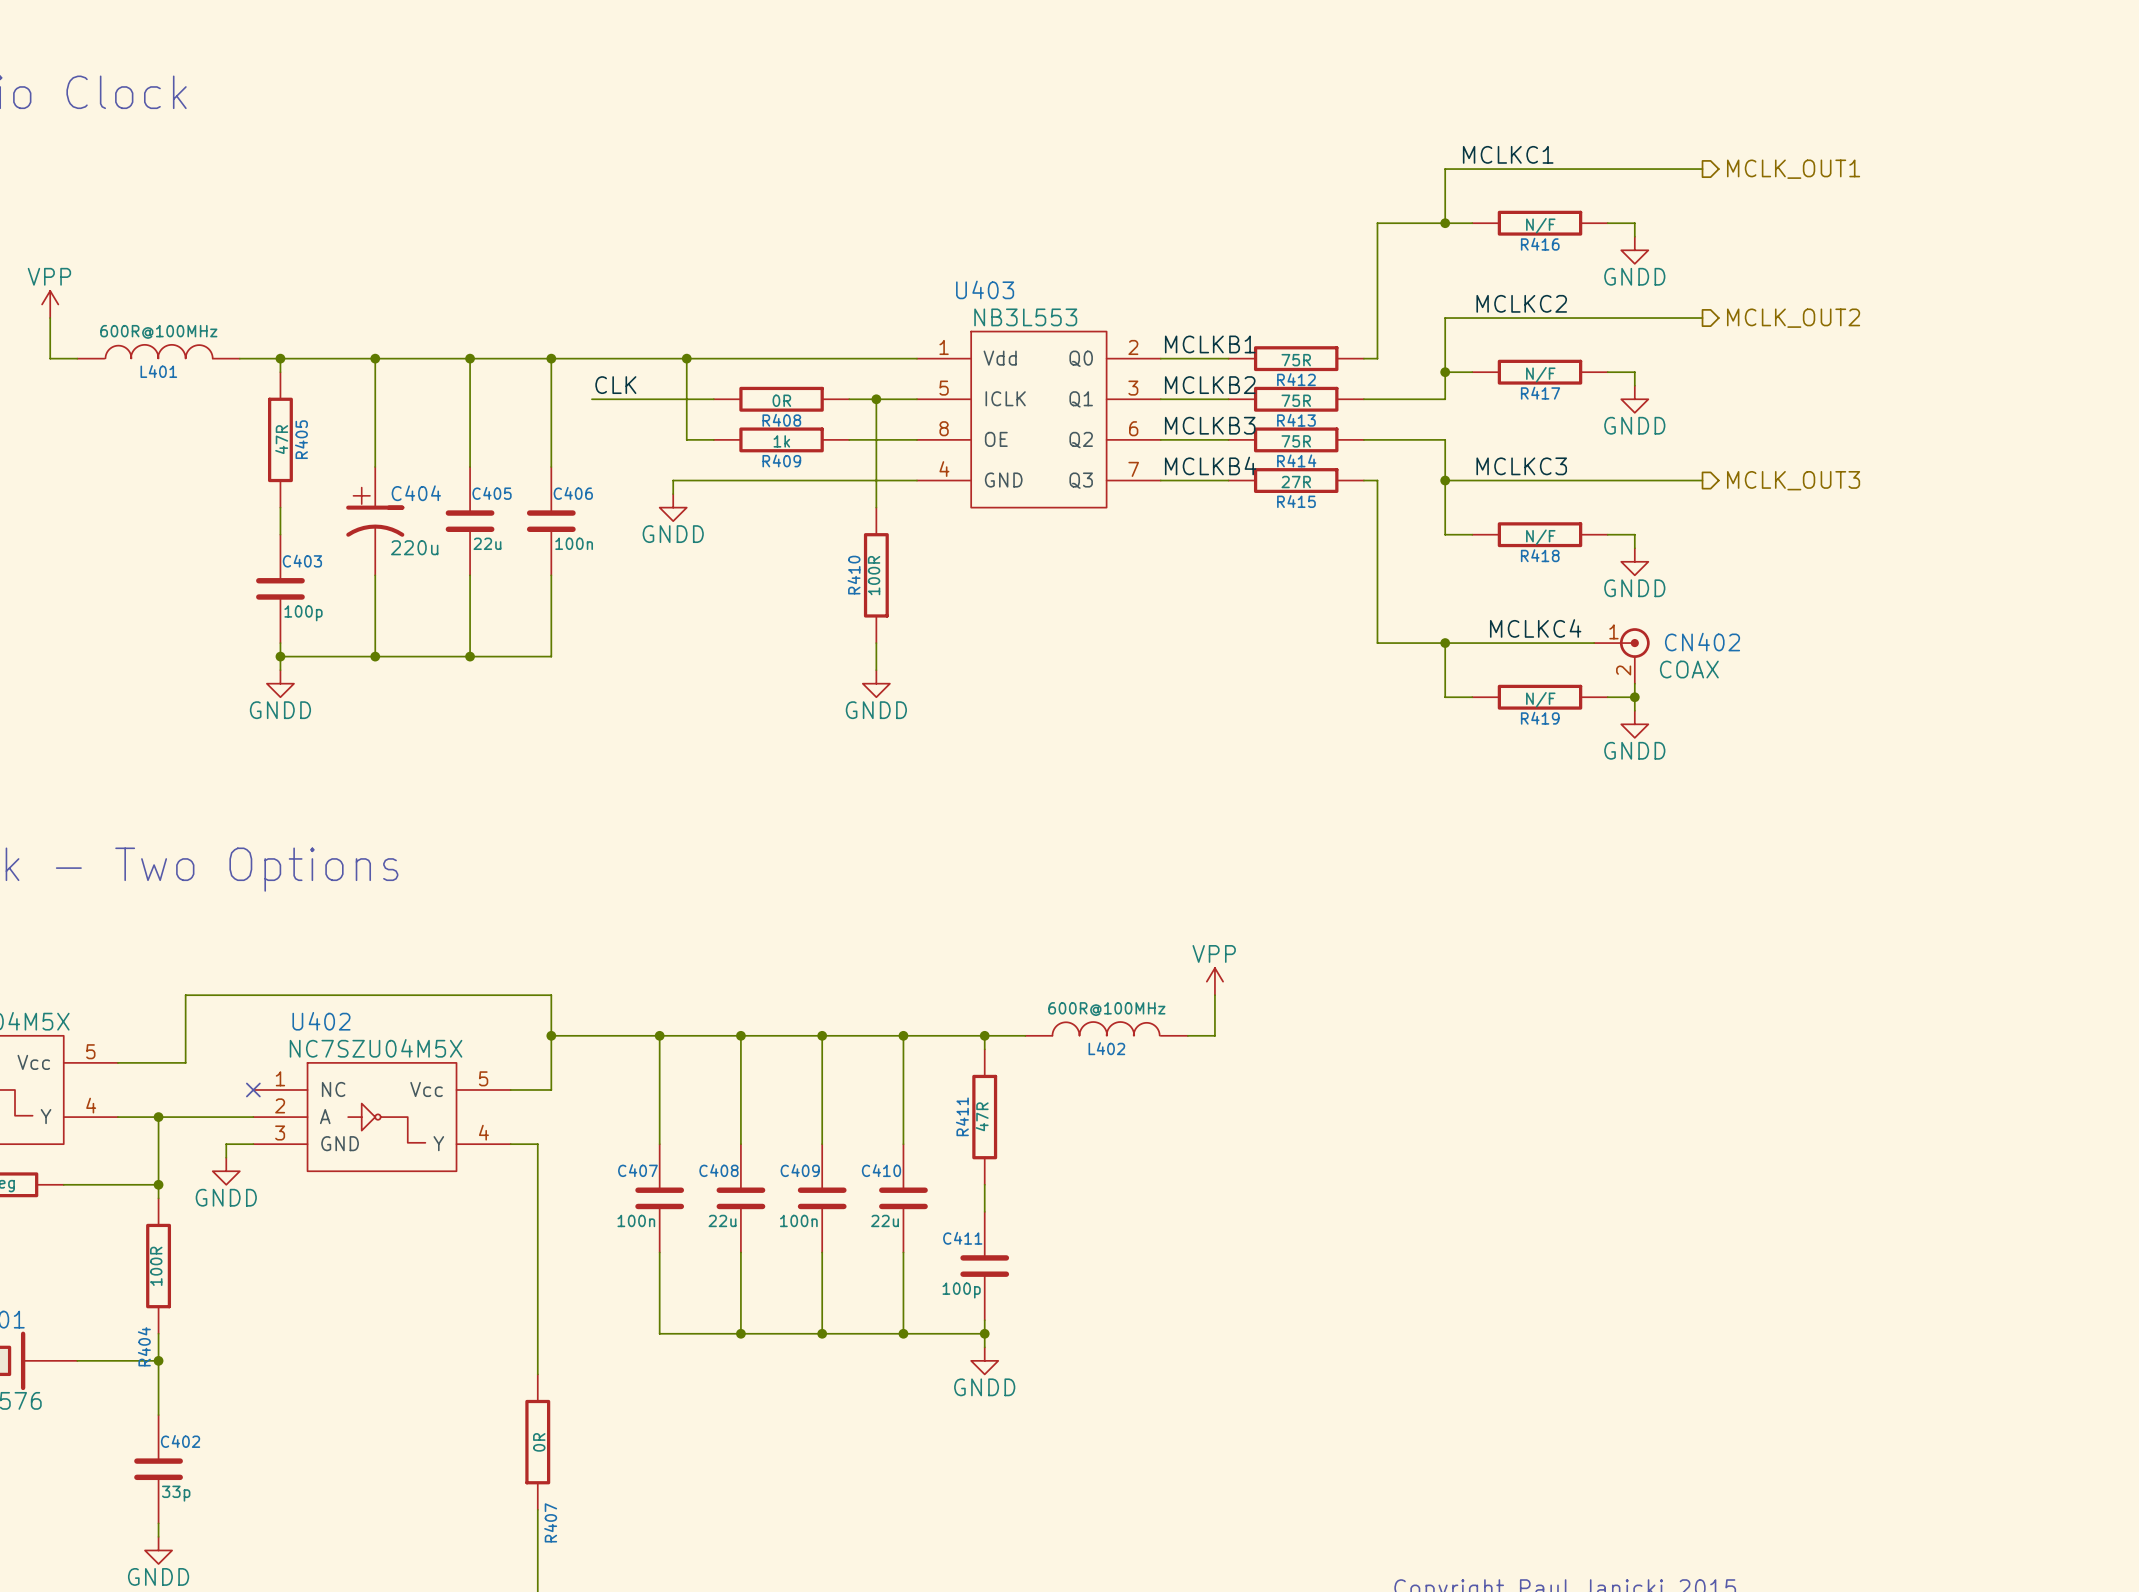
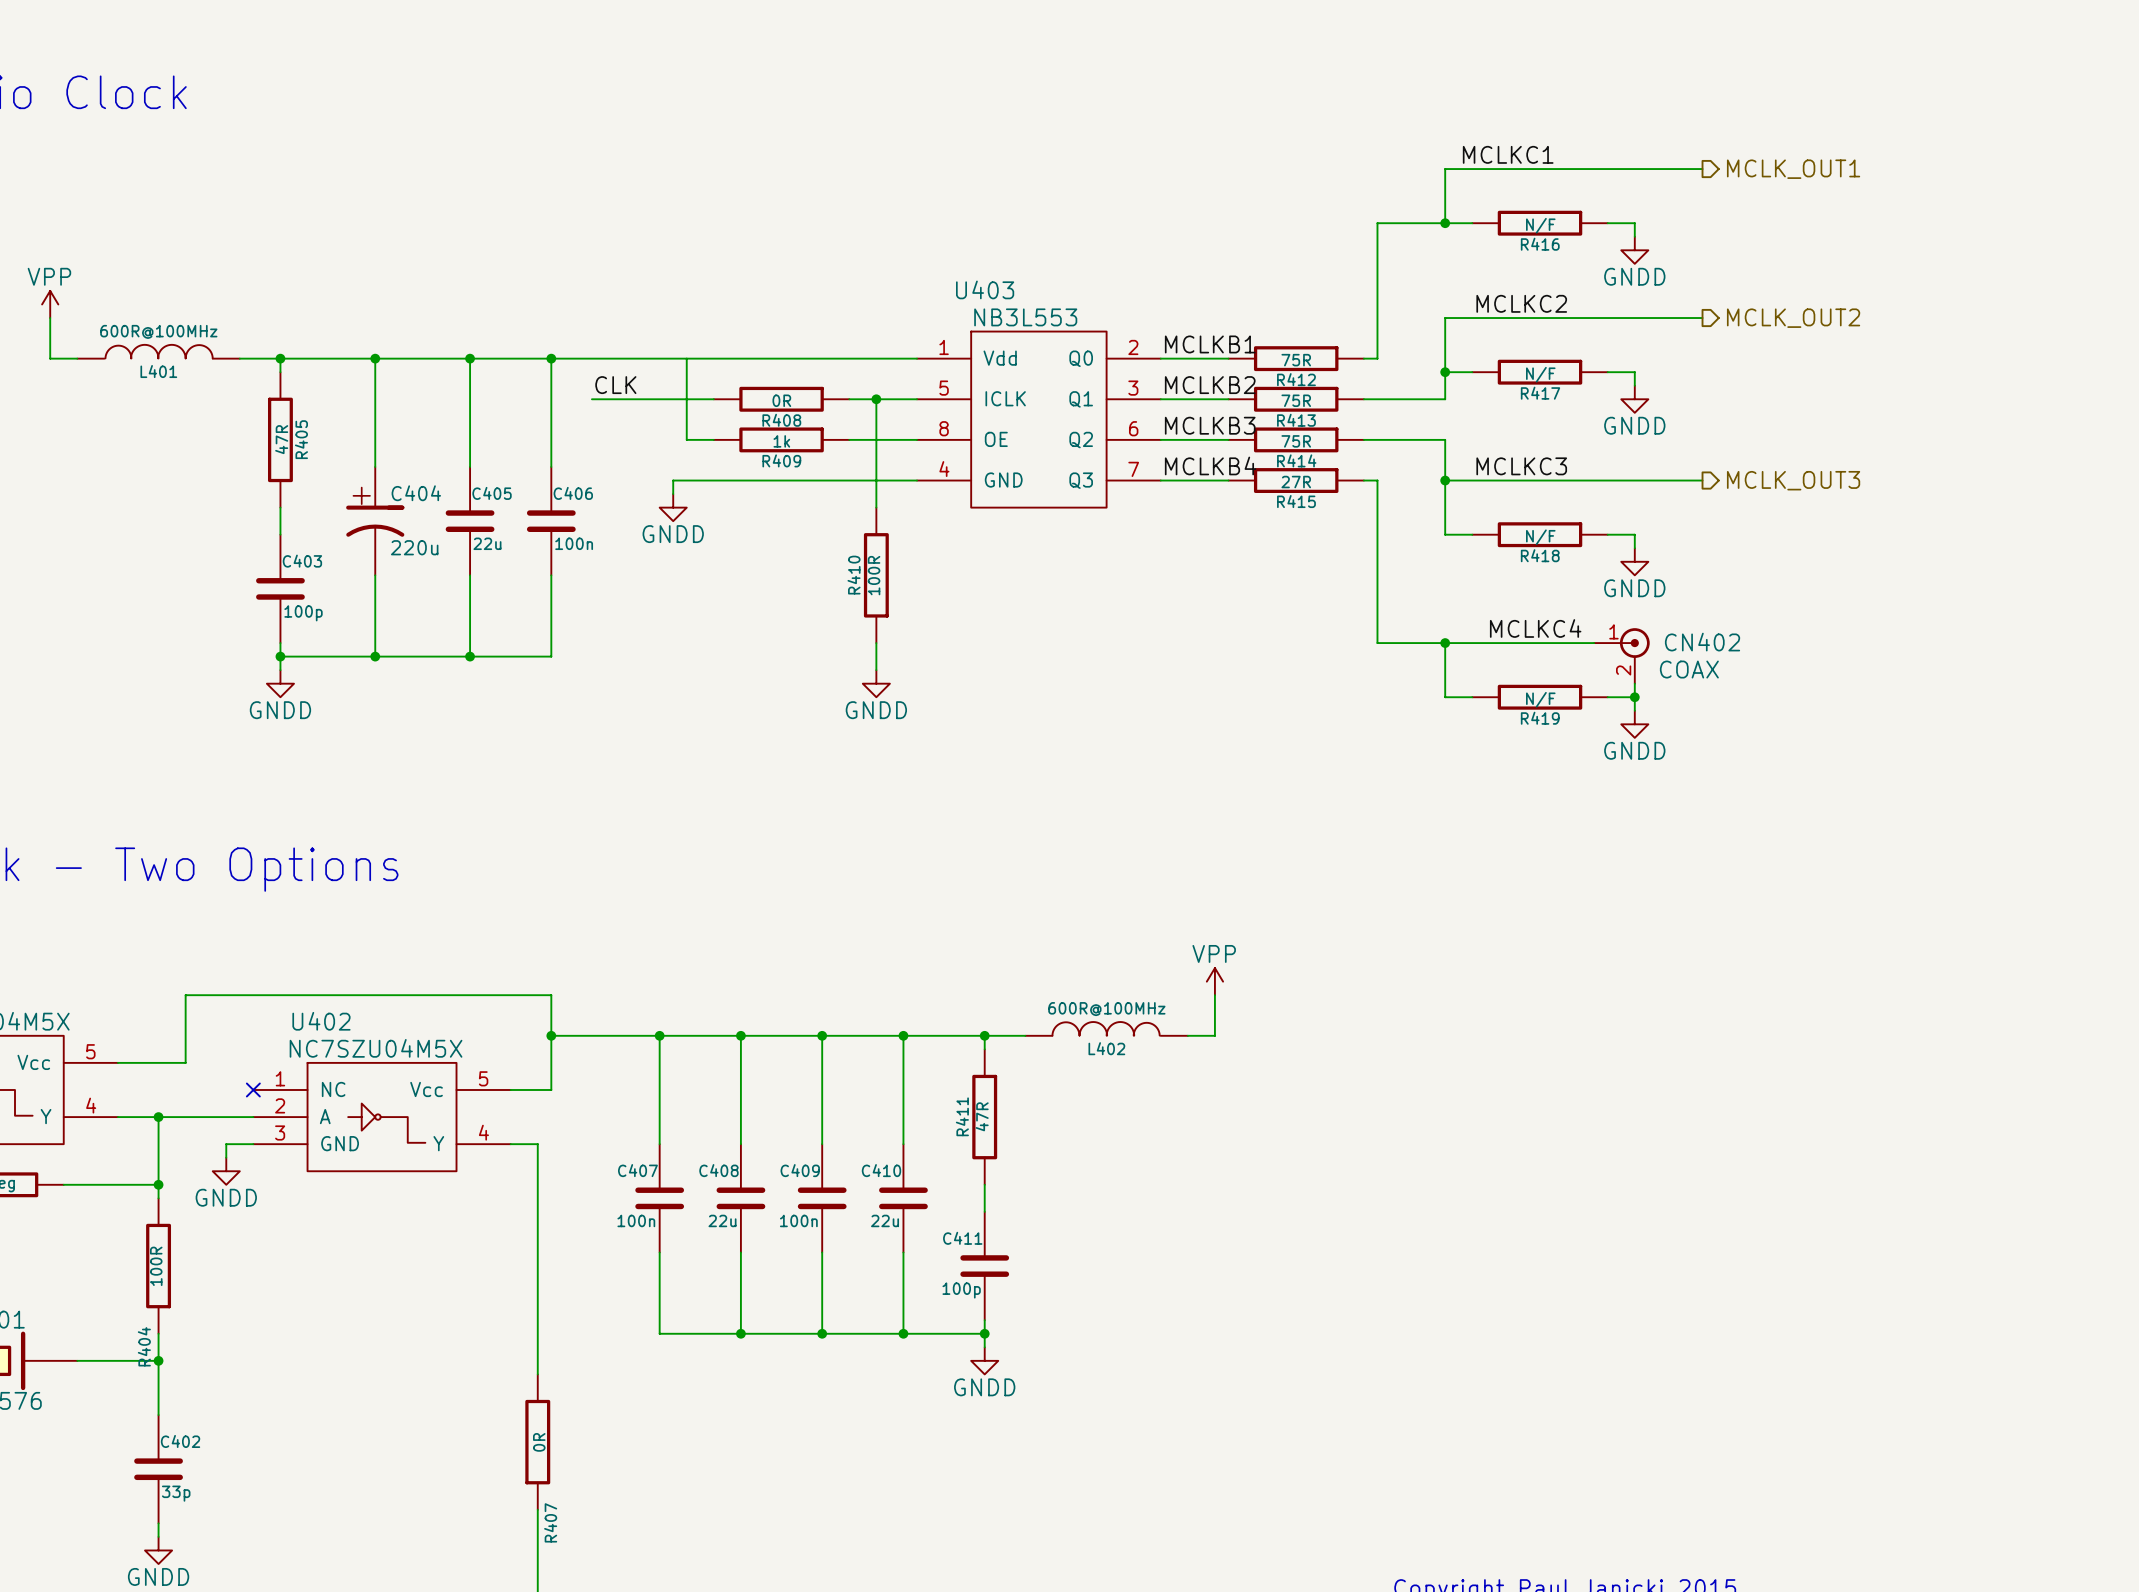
junction: (686, 358) -> none

